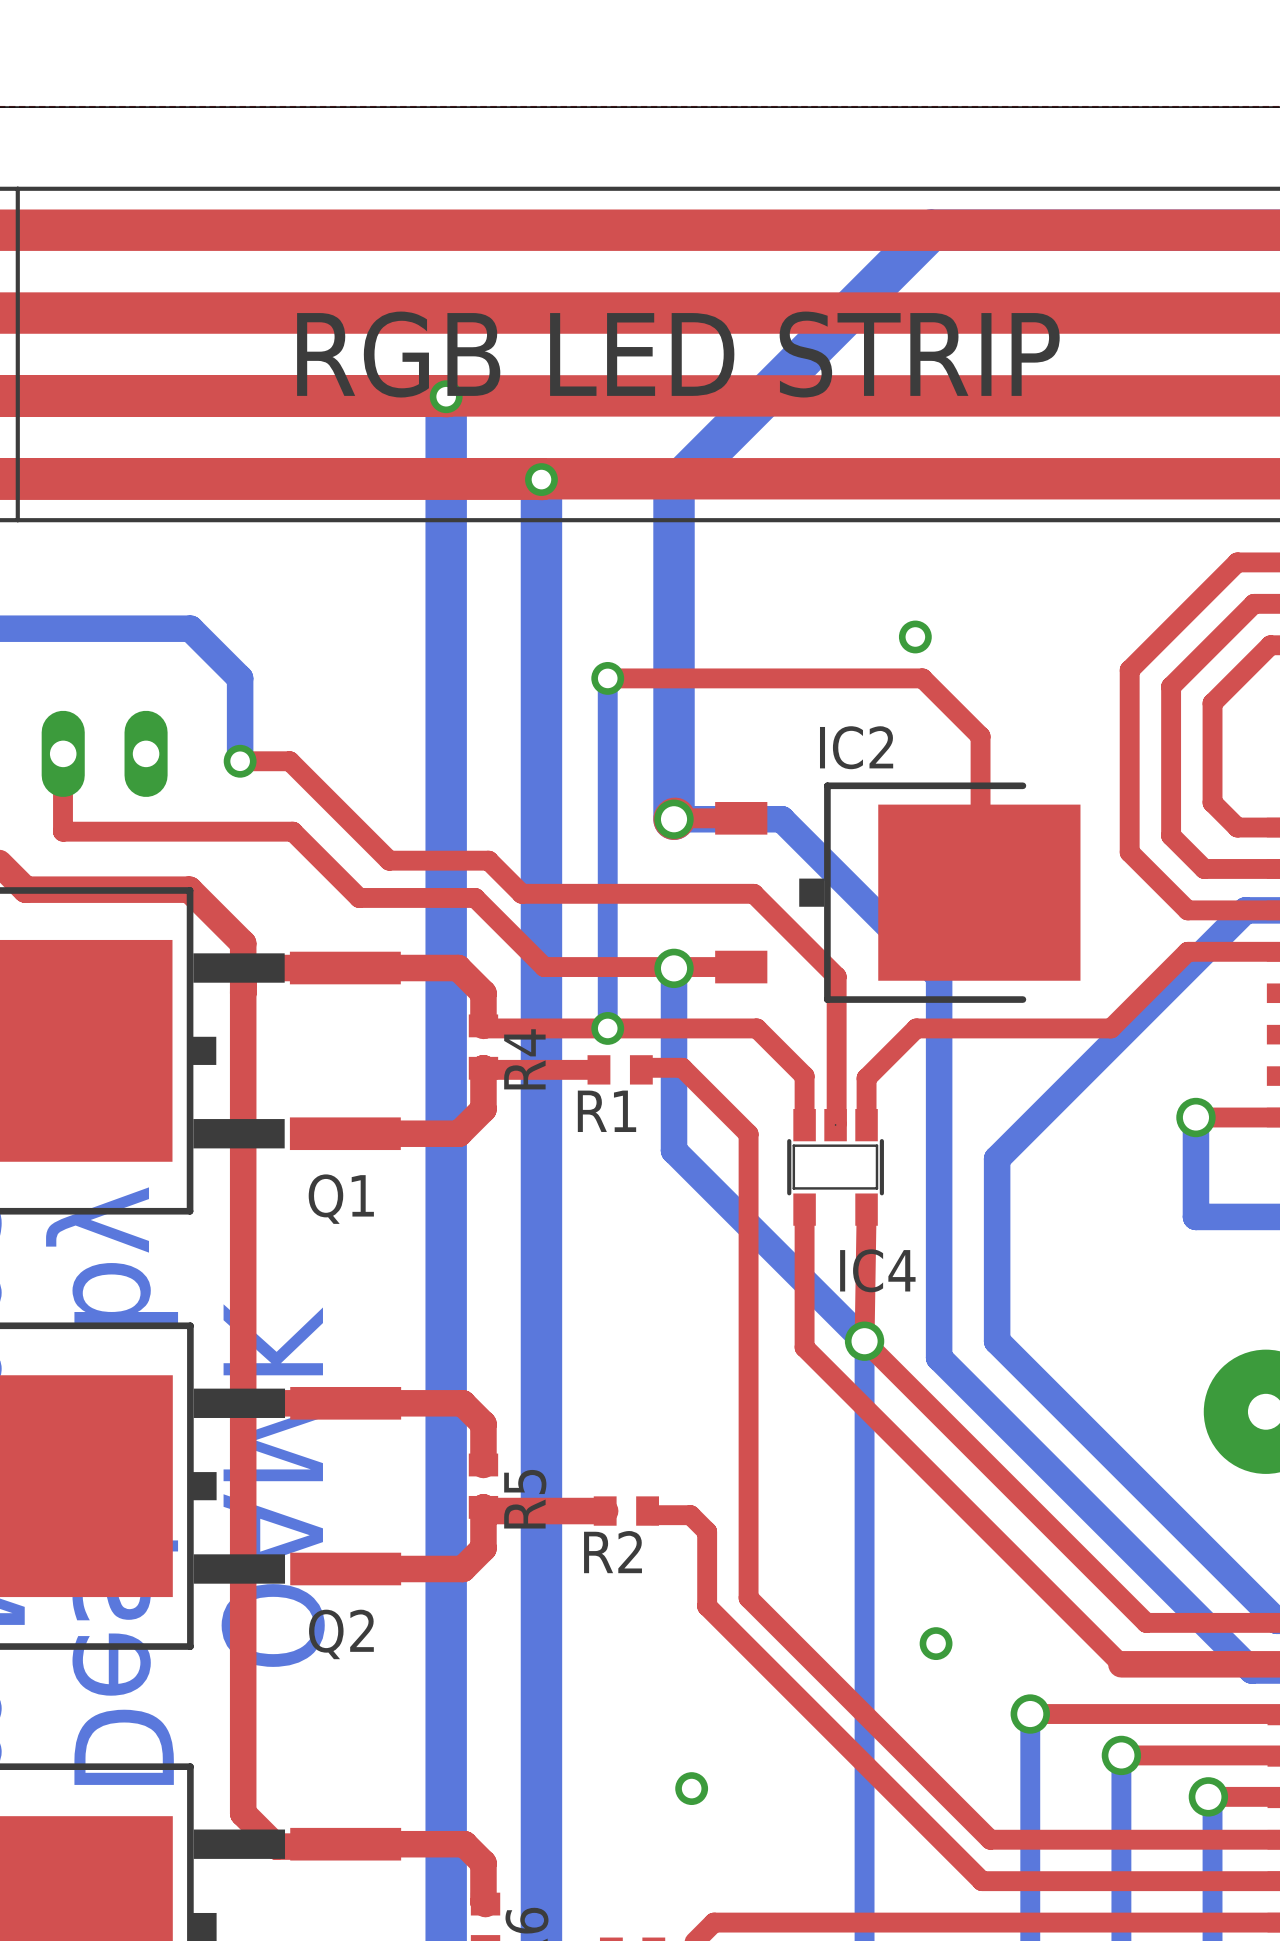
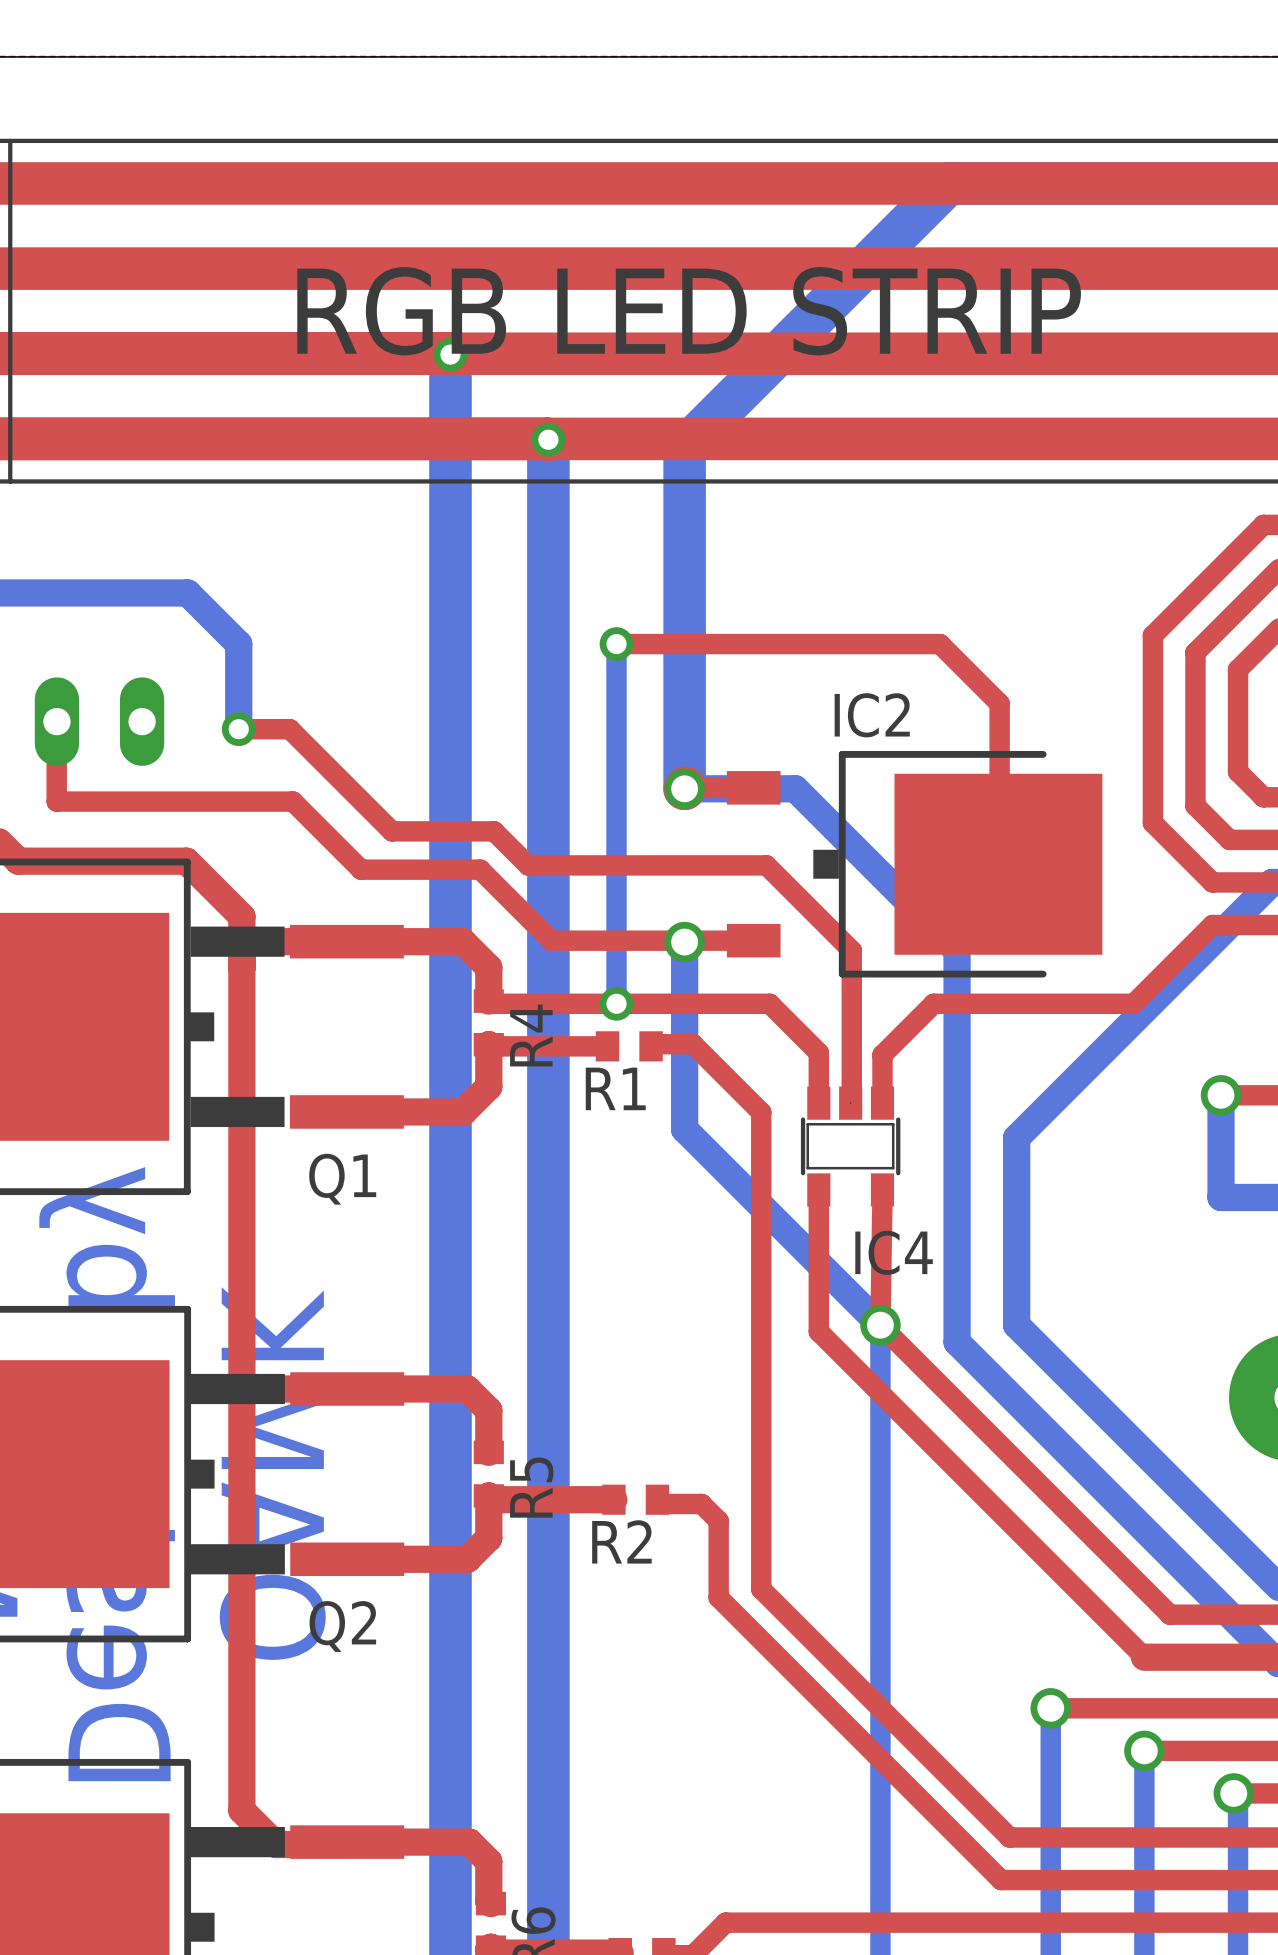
via: (915, 636) -> none
via: (936, 1643) -> none
via: (691, 1788) -> none

